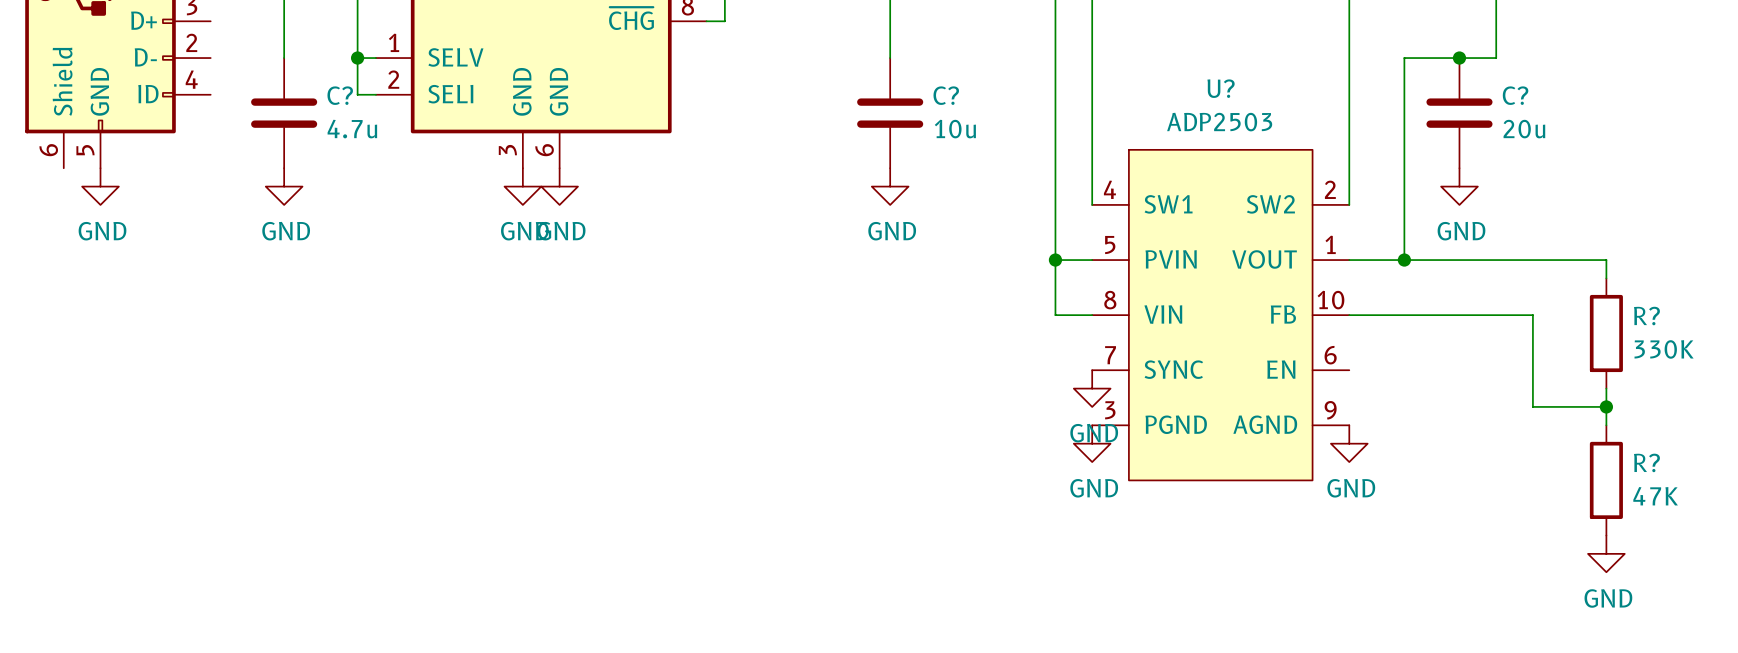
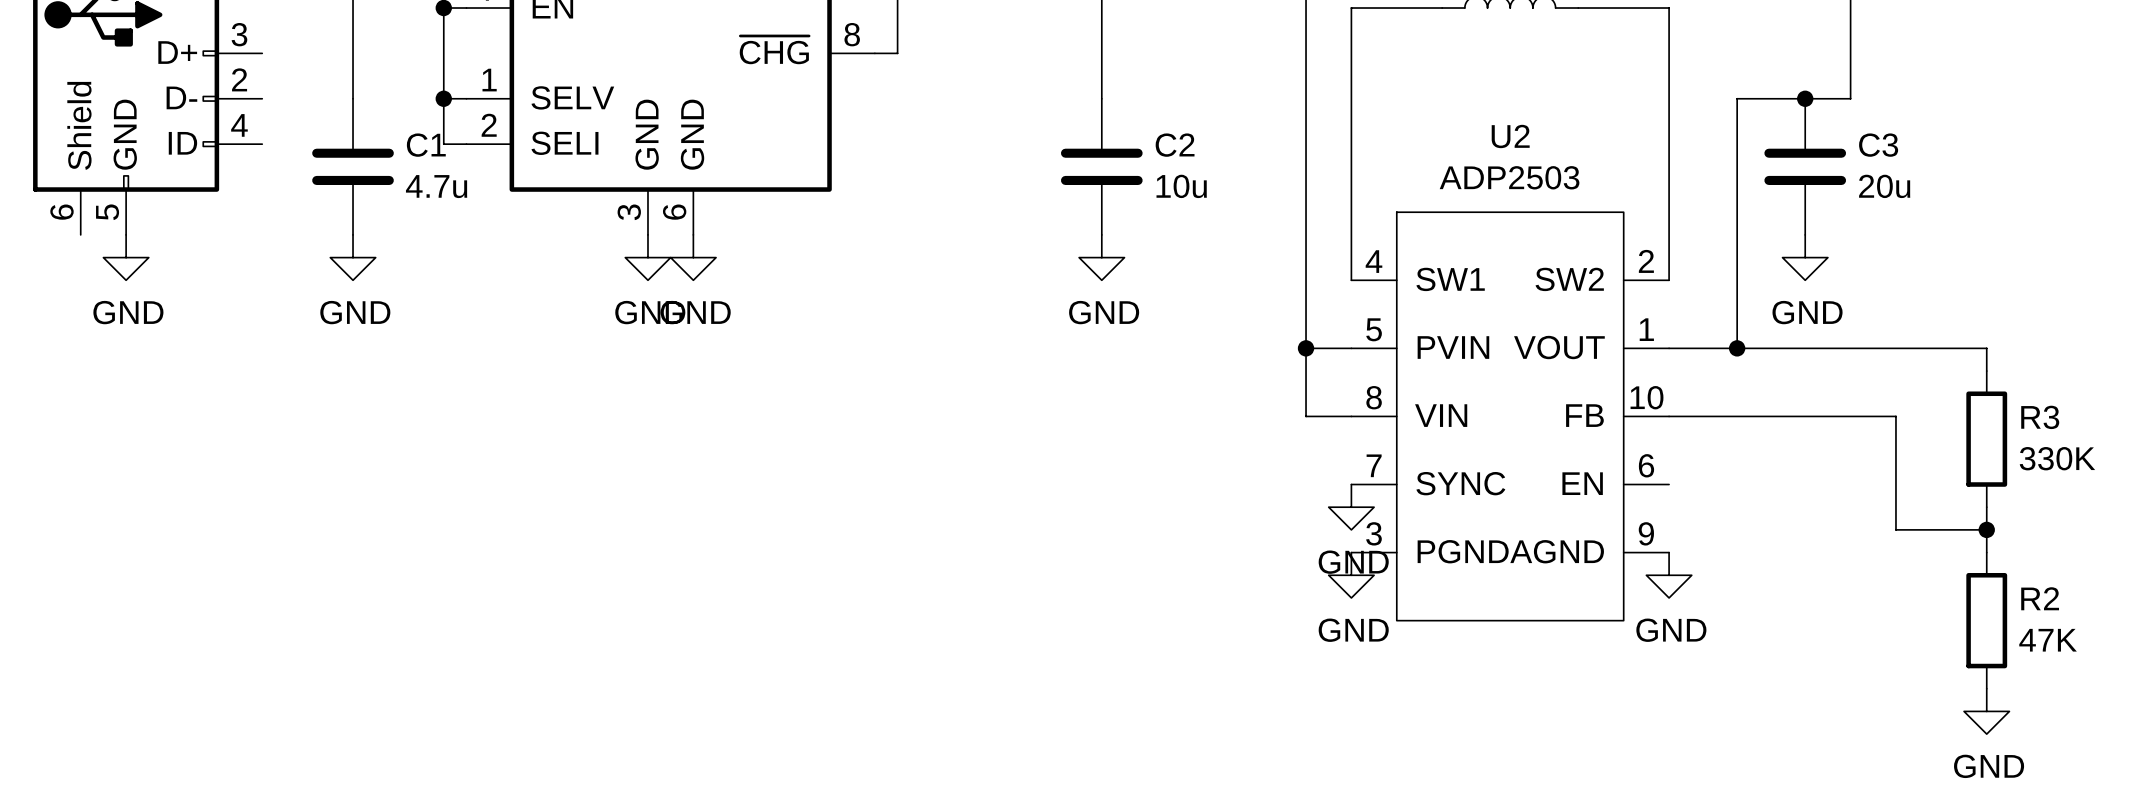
U? name: U? (1221, 88) -> U2 (1510, 136)
C? name: C? (340, 95) -> C1 (426, 145)
C? name: C? (946, 95) -> C2 (1175, 145)
C? name: C? (1515, 95) -> C3 (1878, 145)
R? name: R? (1646, 316) -> R3 (2040, 417)
R? name: R? (1646, 462) -> R2 (2040, 598)

